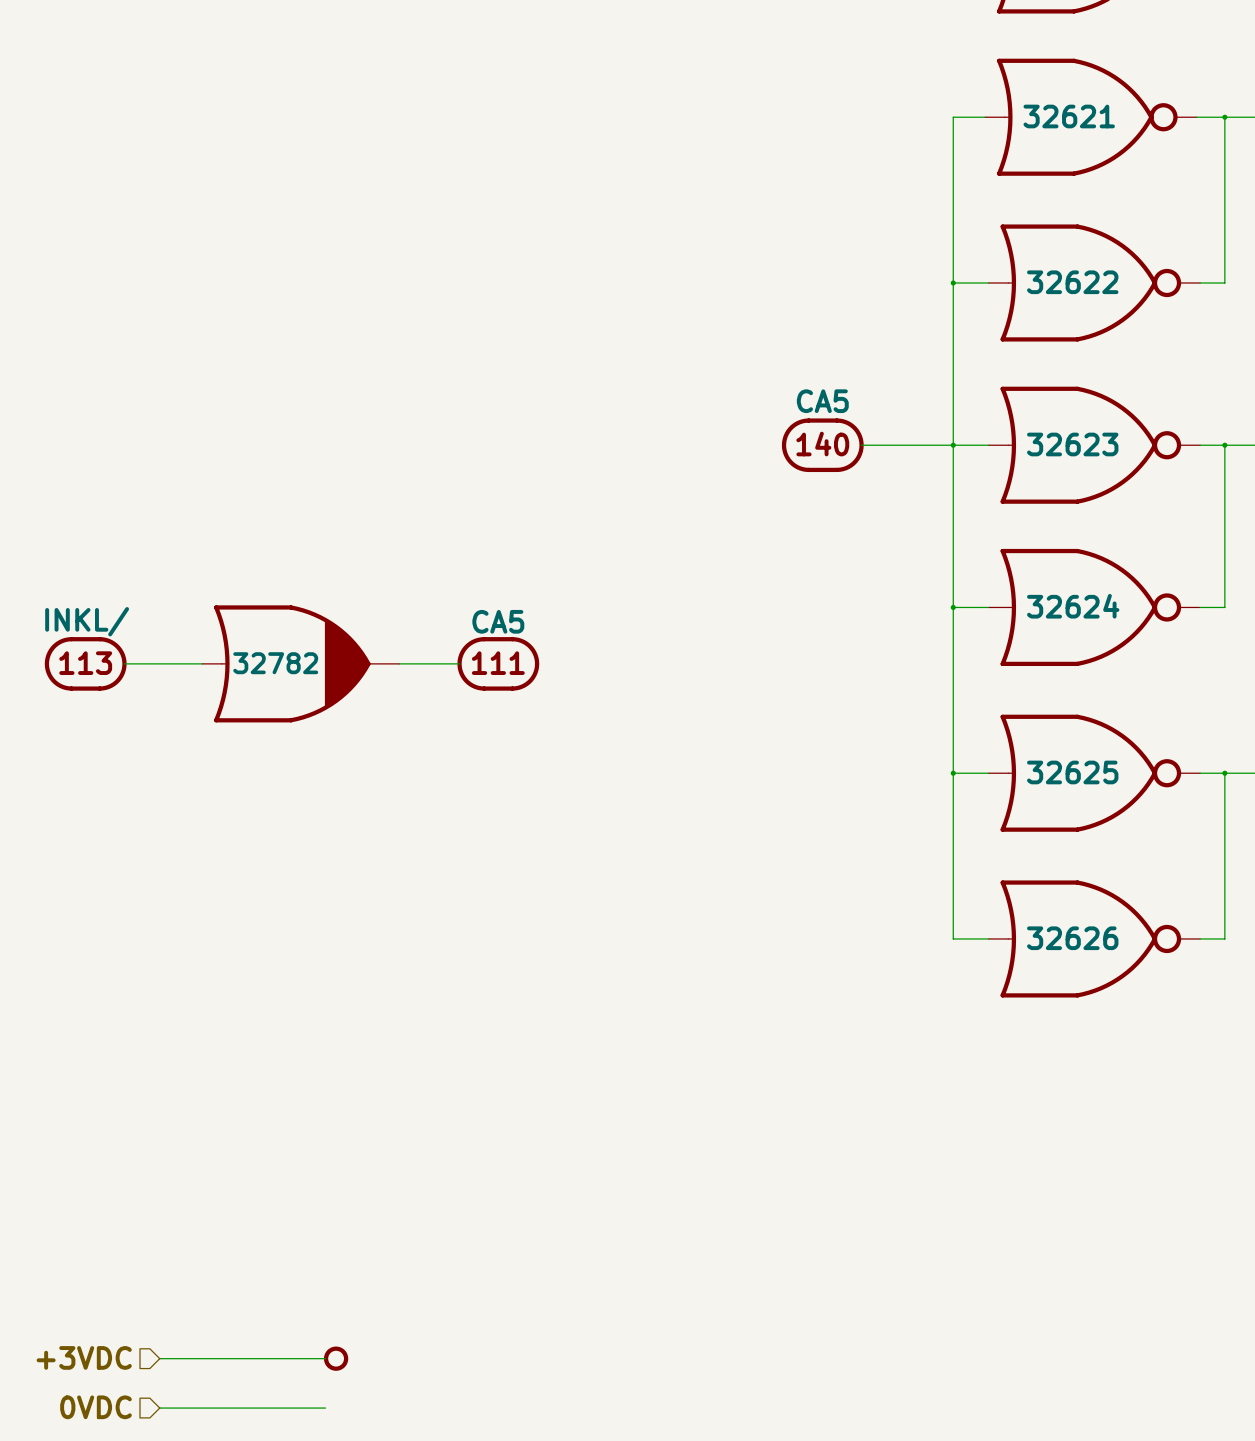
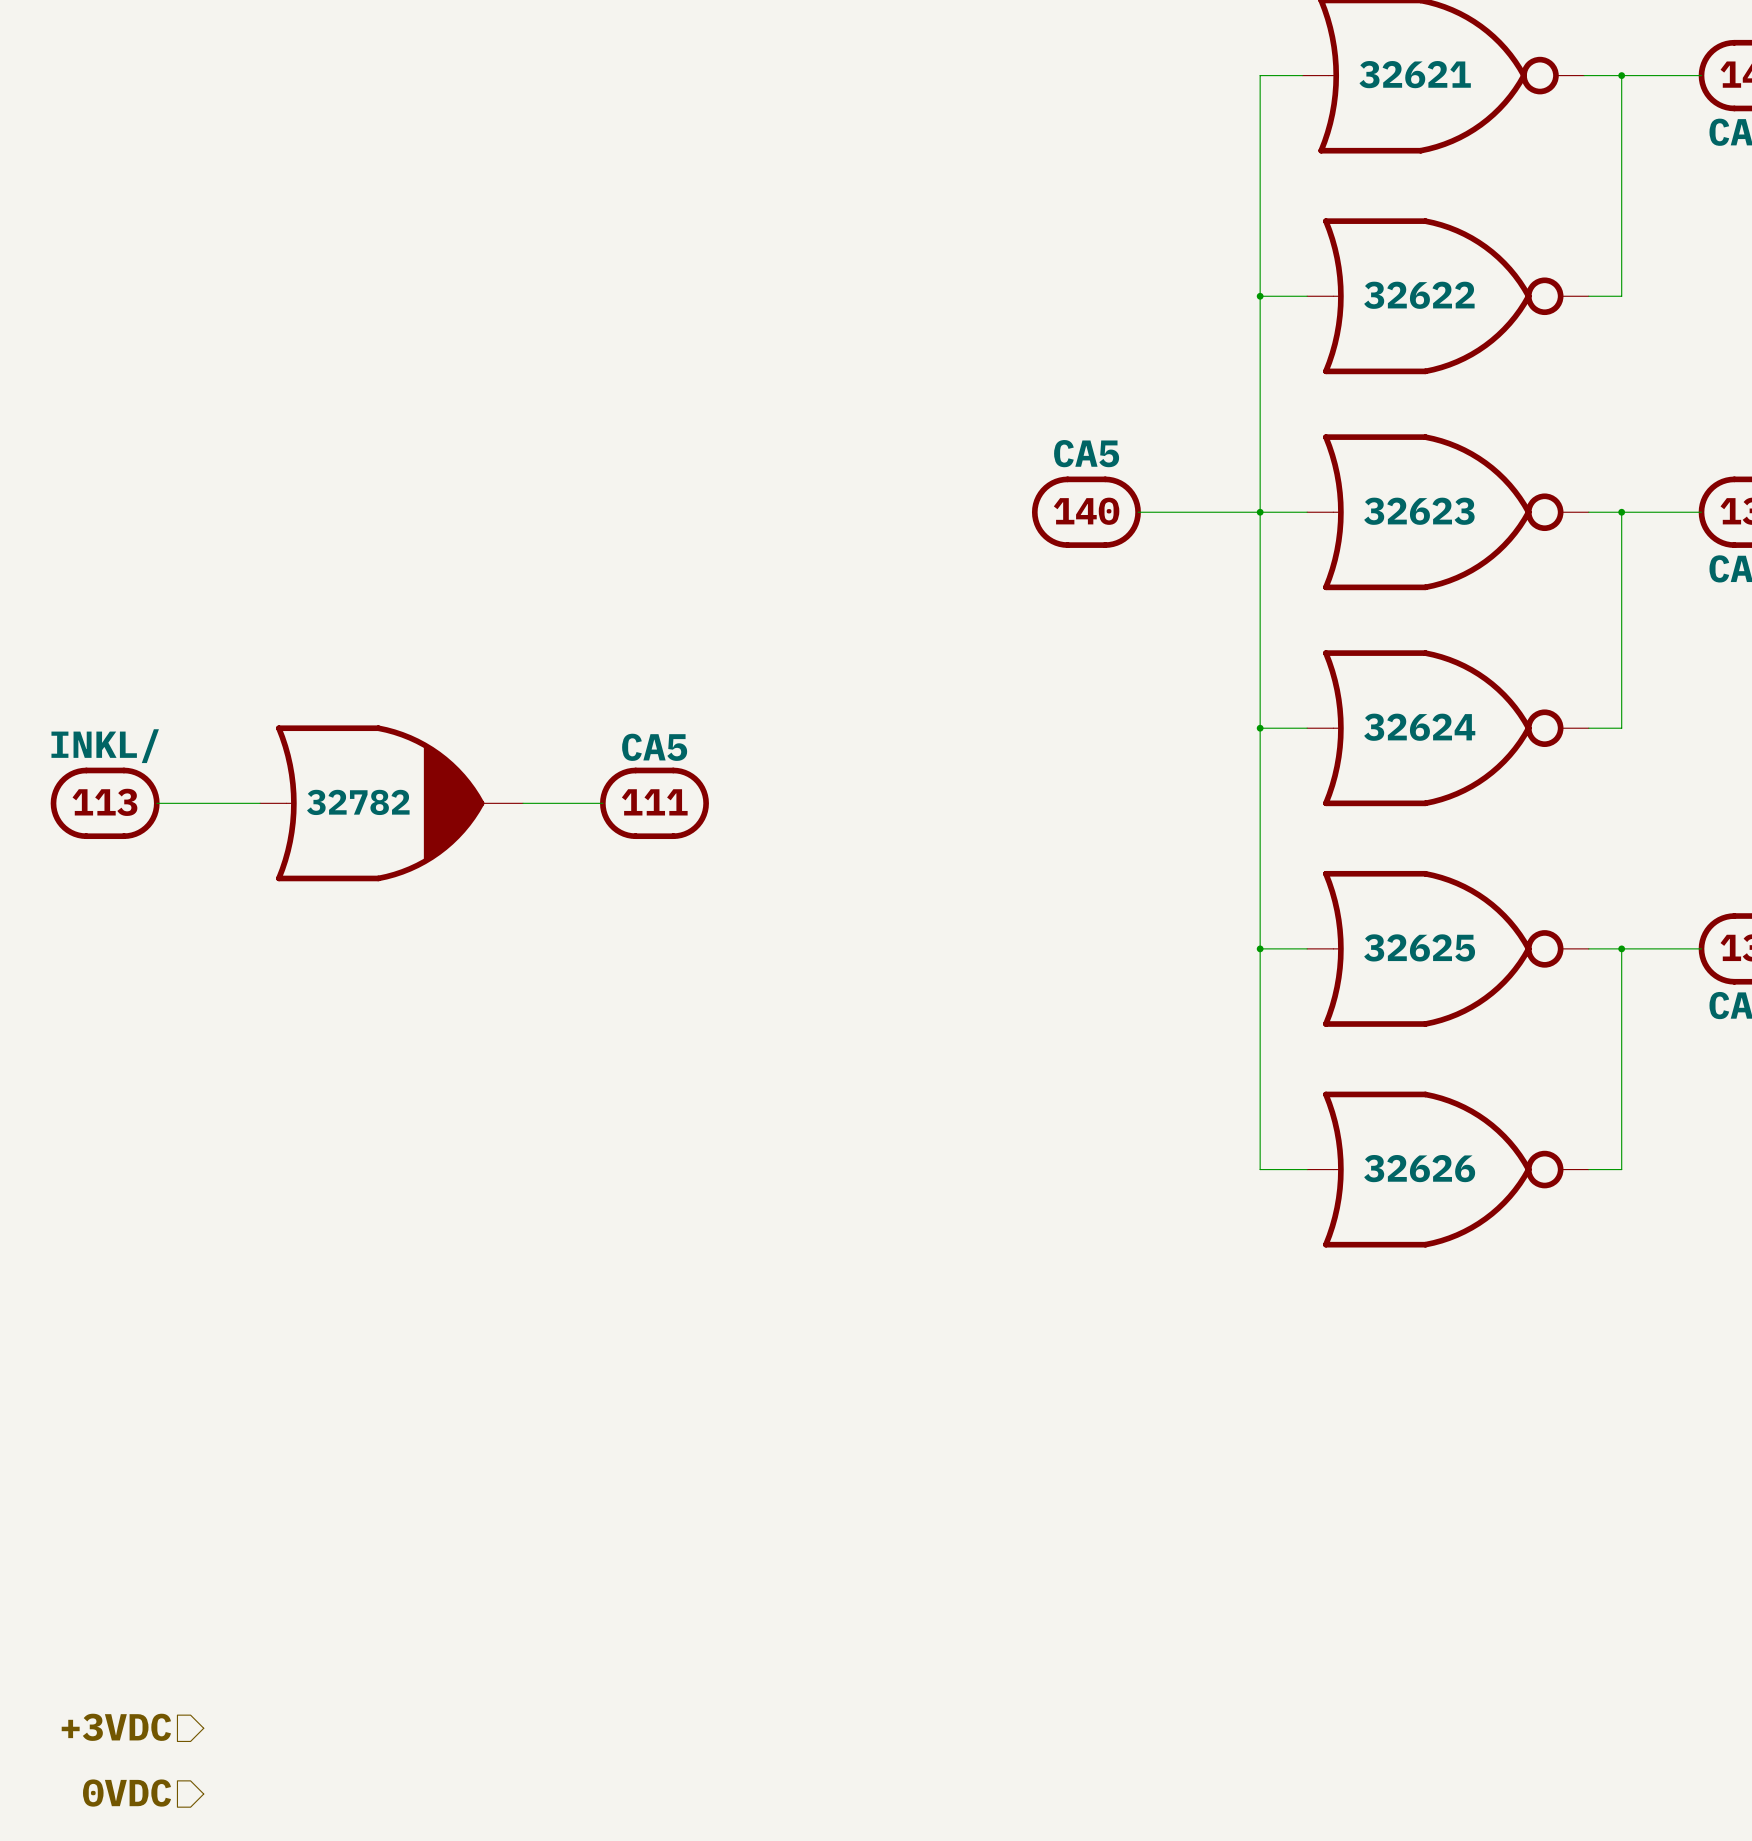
wire: (159, 1358) (325, 1358) -> none
part: (336, 1358) -> none
wire: (159, 1408) (325, 1408) -> none

